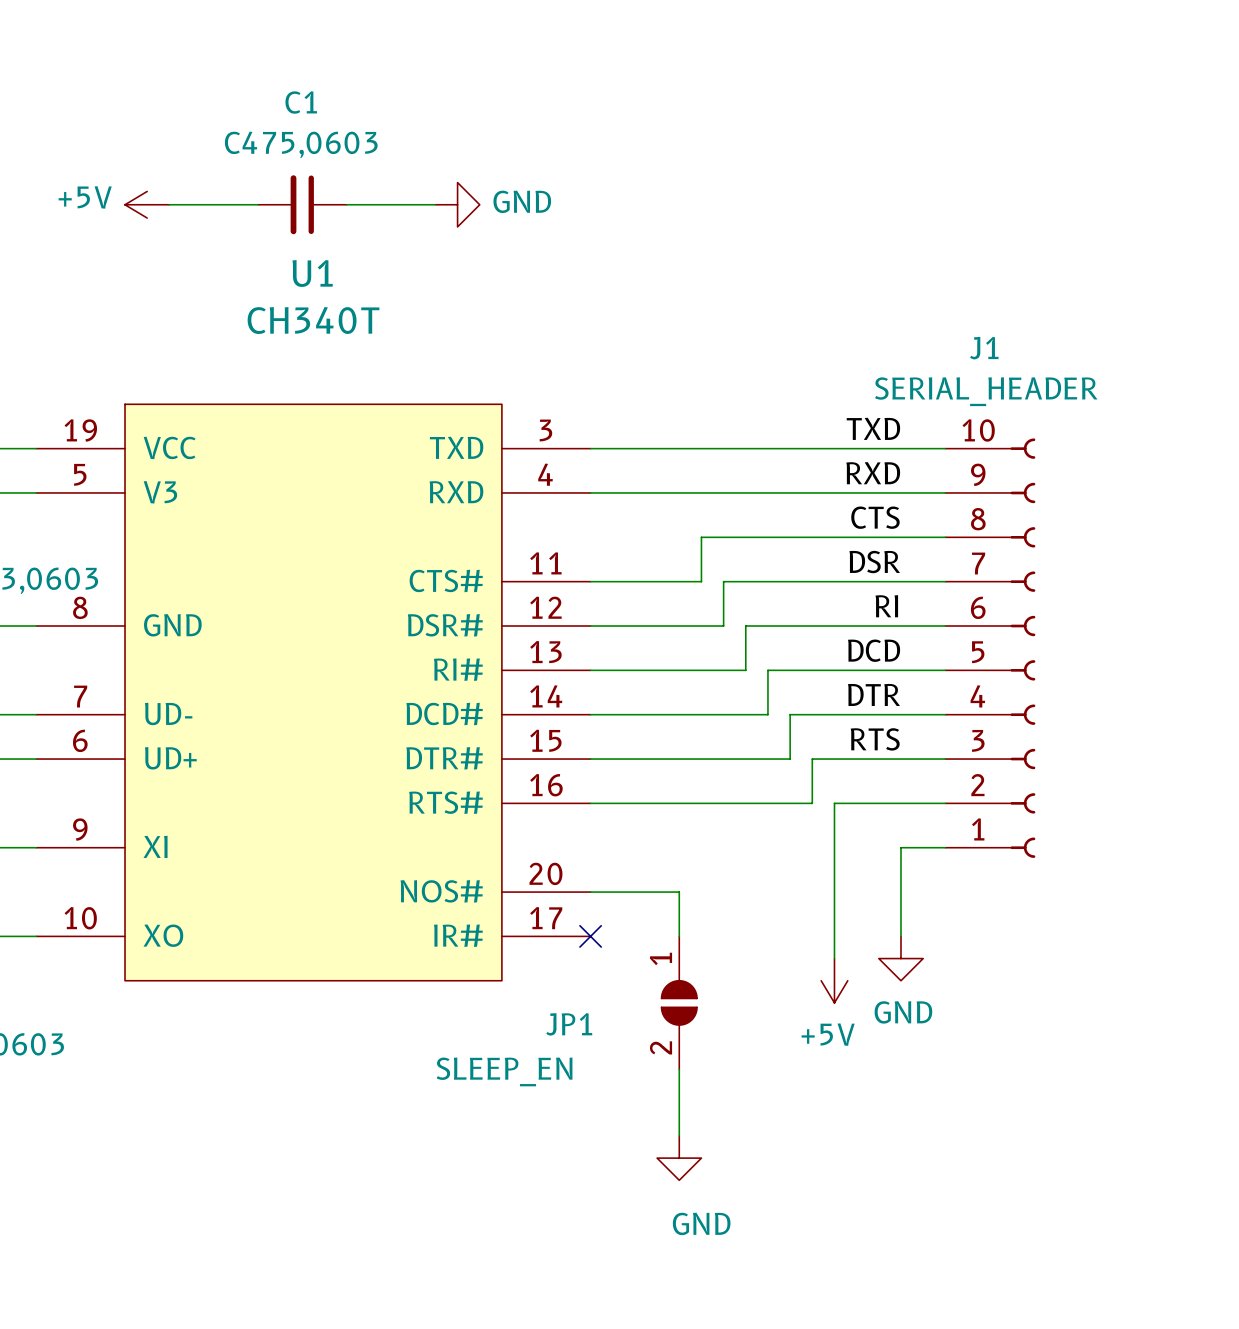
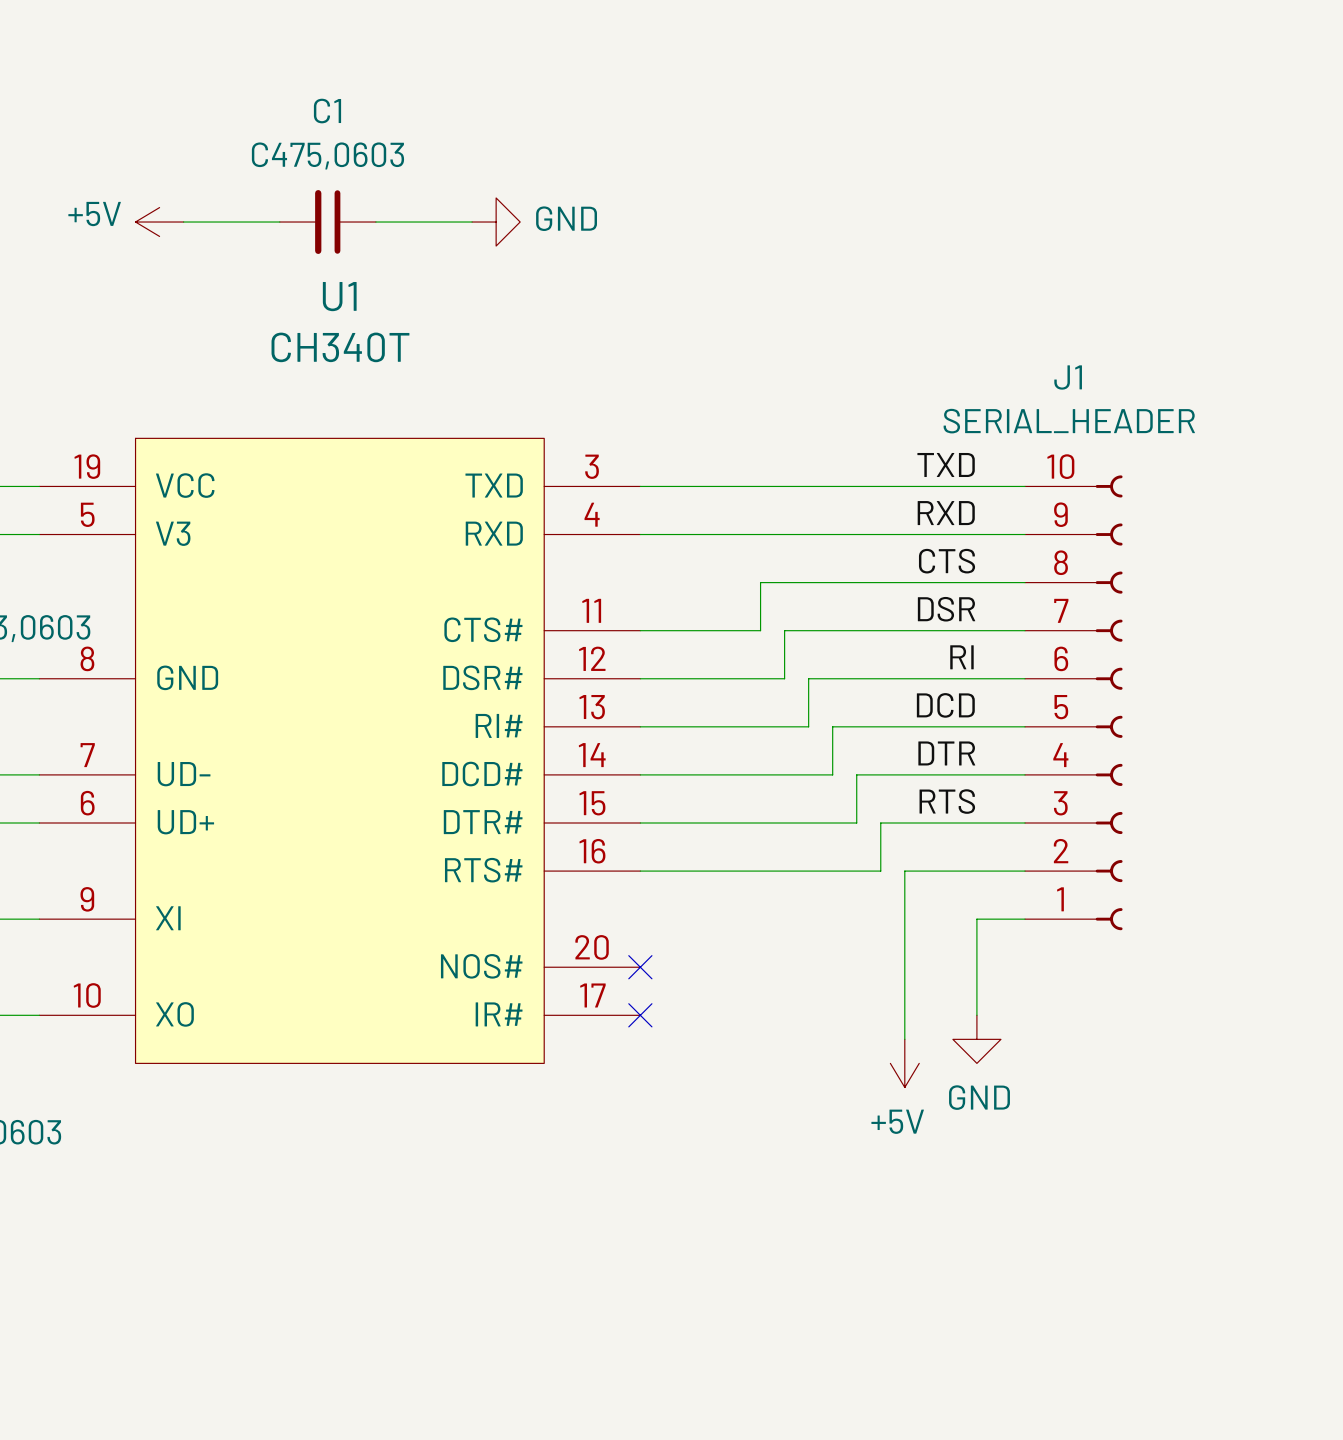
wire: (590, 892) (679, 892) (679, 936) -> none
no-connect mark: none -> (640, 967)
JP1: SLEEP_EN (679, 1002) -> none
wire: (679, 1069) (679, 1135) -> none
power symbol: GND (679, 1158) -> none

